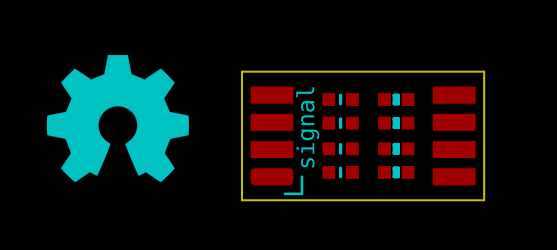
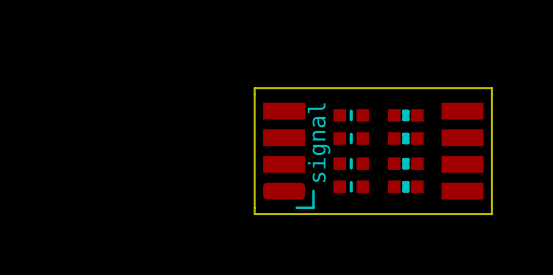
drawing: [46, 54, 189, 183] -> none

